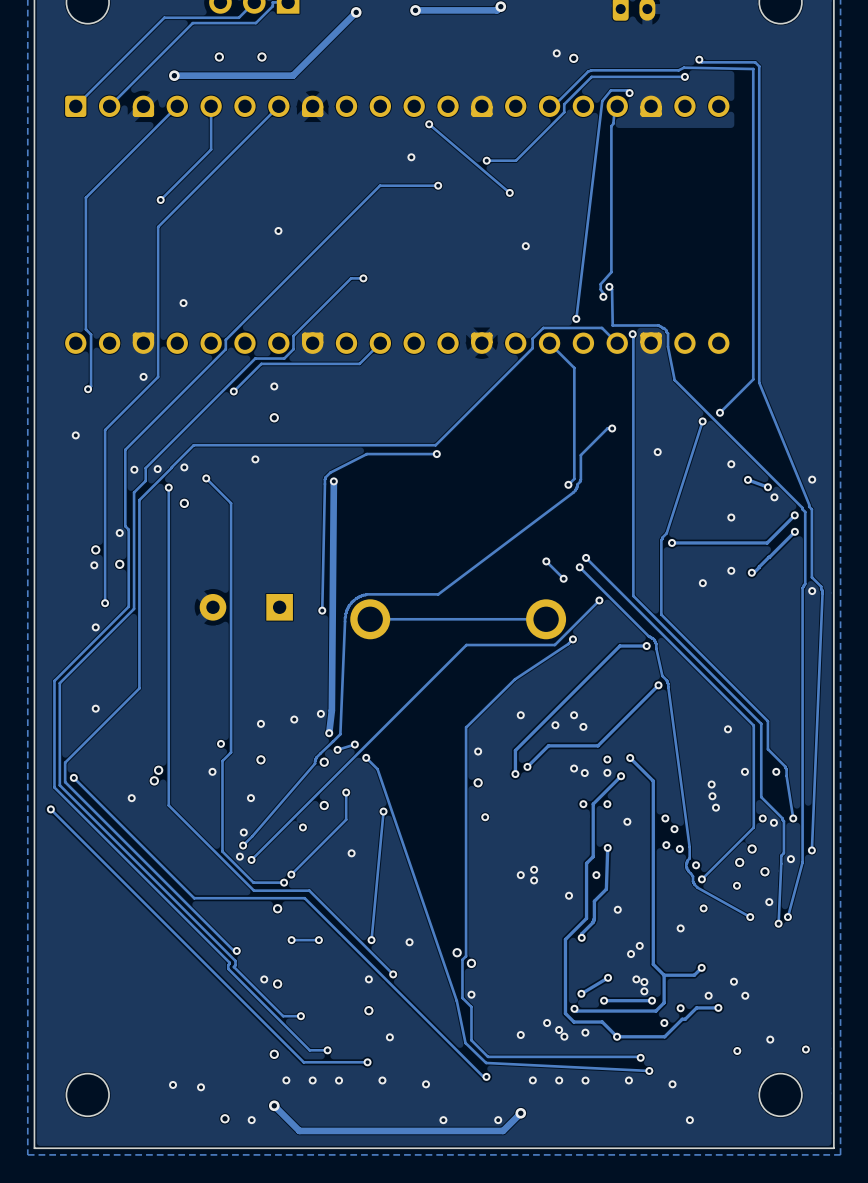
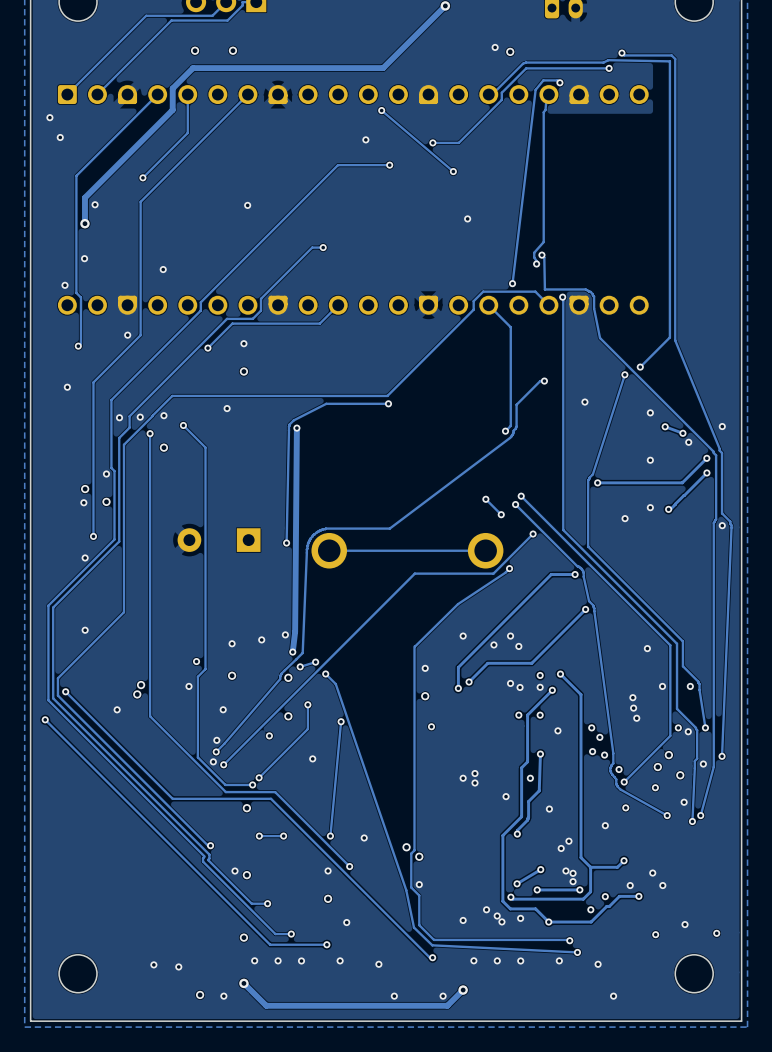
via: (415, 10) -> none
track: (497, 10) (415, 10) -> (442, 9) (383, 68) (193, 68) (172, 88) (172, 110) (84, 197) (84, 223)
track: (356, 12) (292, 75) (174, 75) -> none
via: (356, 12) -> none
via: (174, 75) -> none
via: none -> (49, 117)
via: none -> (60, 137)
via: none -> (95, 204)
via: none -> (84, 223)
via: none -> (84, 258)
via: none -> (65, 285)

